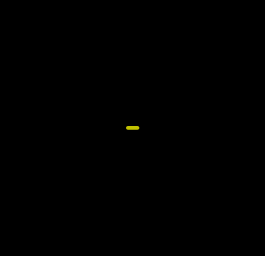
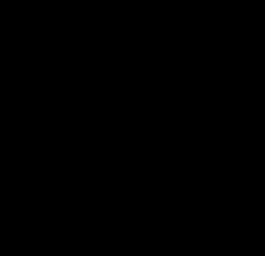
board edge: (127, 127) (137, 127) -> none

